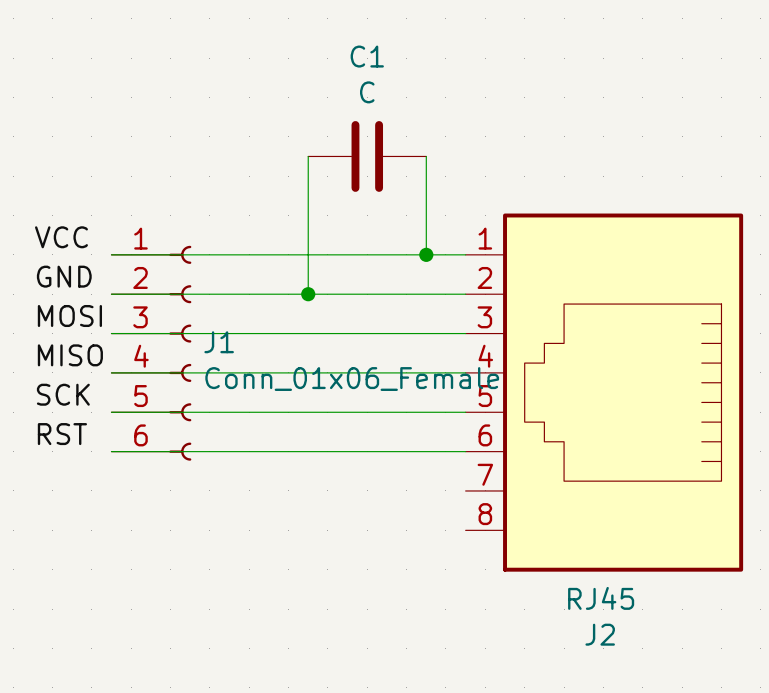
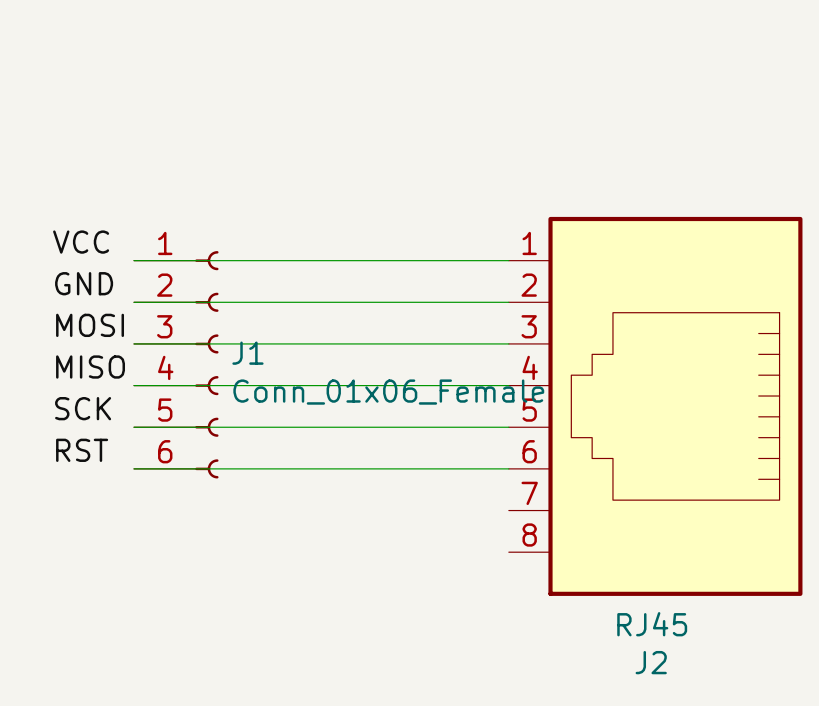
wire: (308, 156) (308, 294) -> none
C1: C (367, 156) -> none
wire: (426, 156) (426, 254) -> none
junction: (426, 254) -> none
junction: (308, 294) -> none

